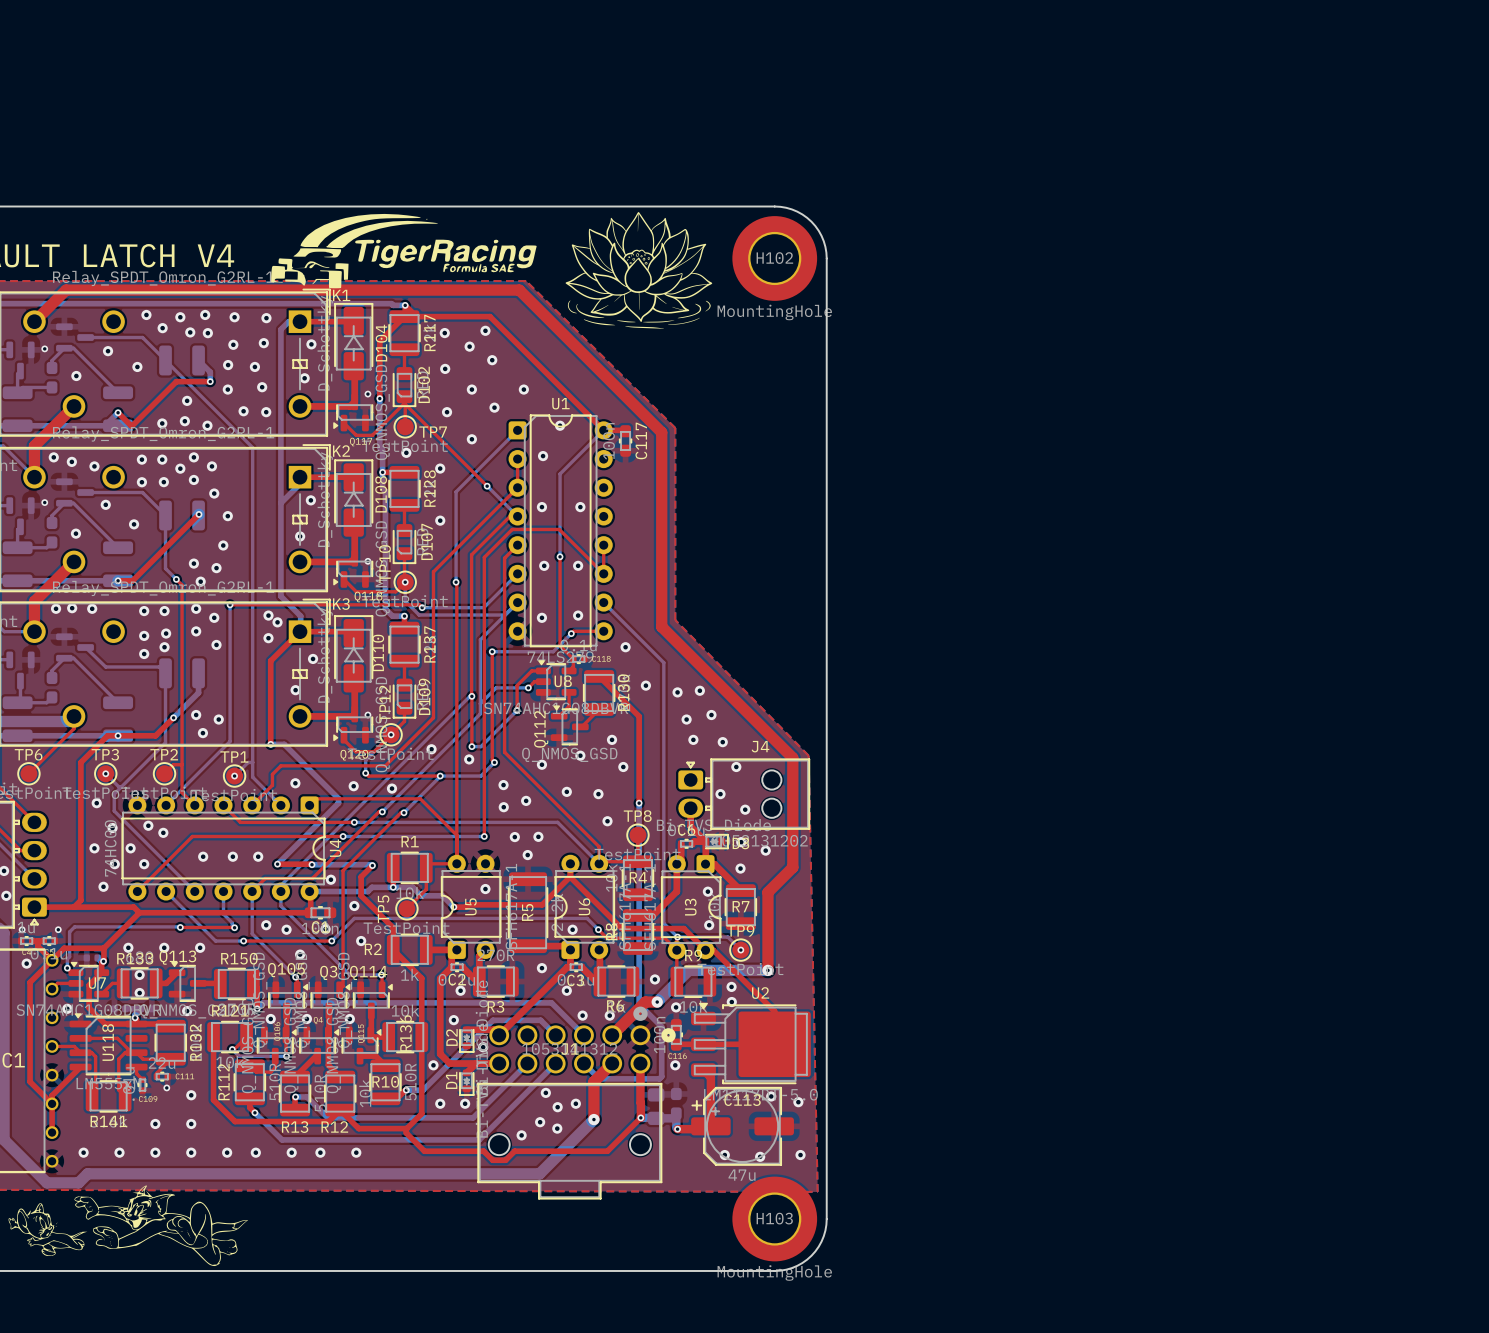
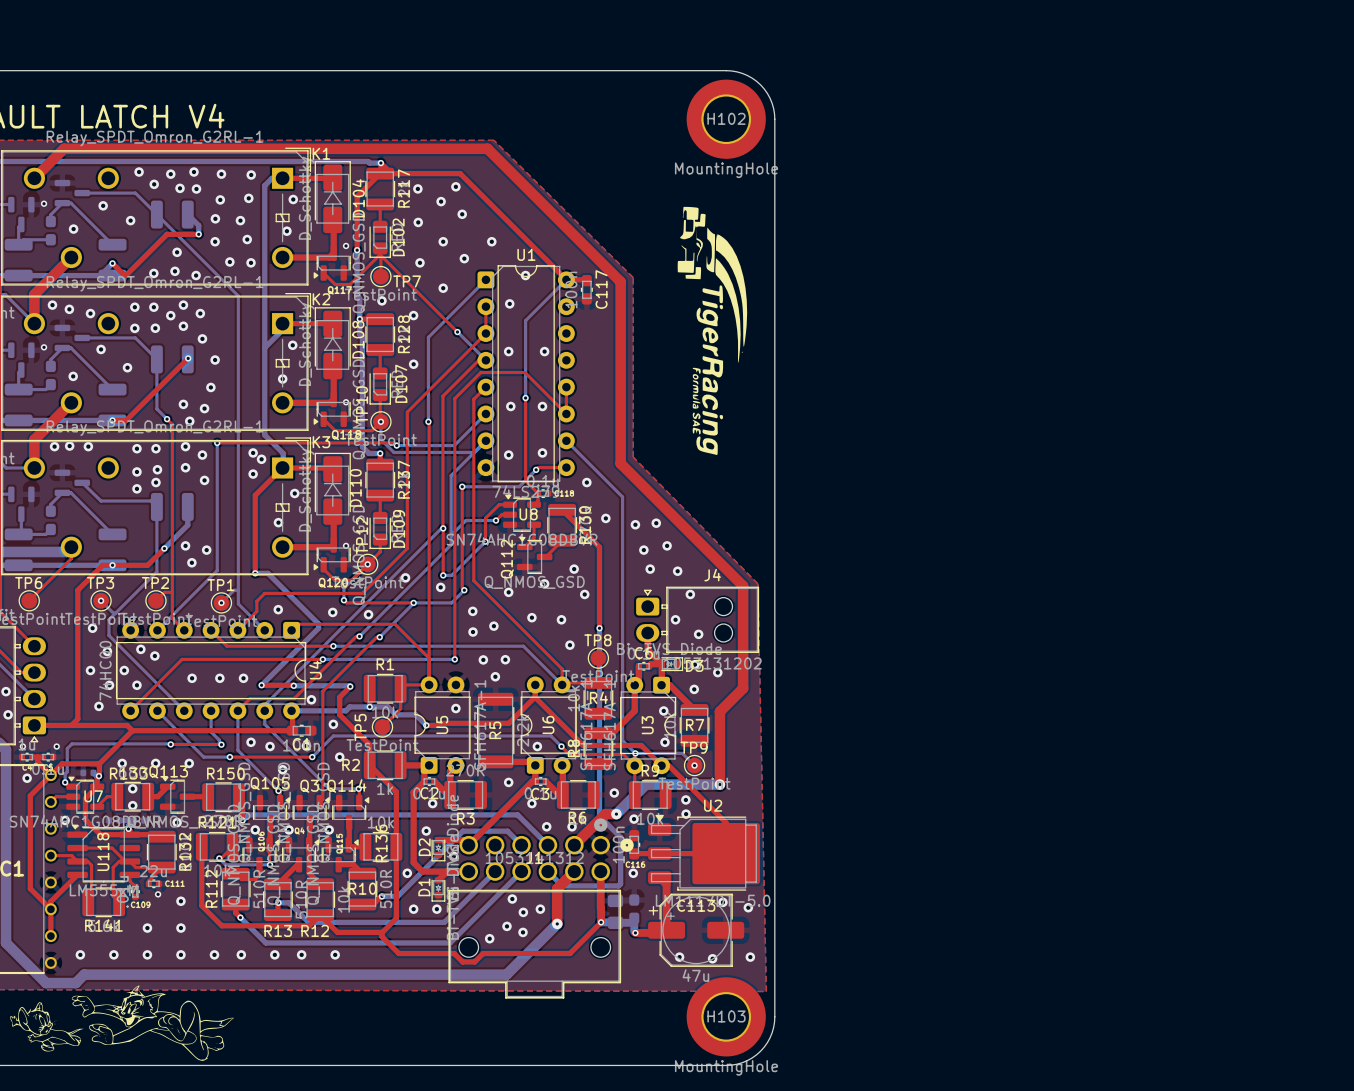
drawing: [565, 212, 713, 329] -> none
drawing: [271, 213, 537, 289] -> none
drawing: none -> [677, 206, 748, 455]

